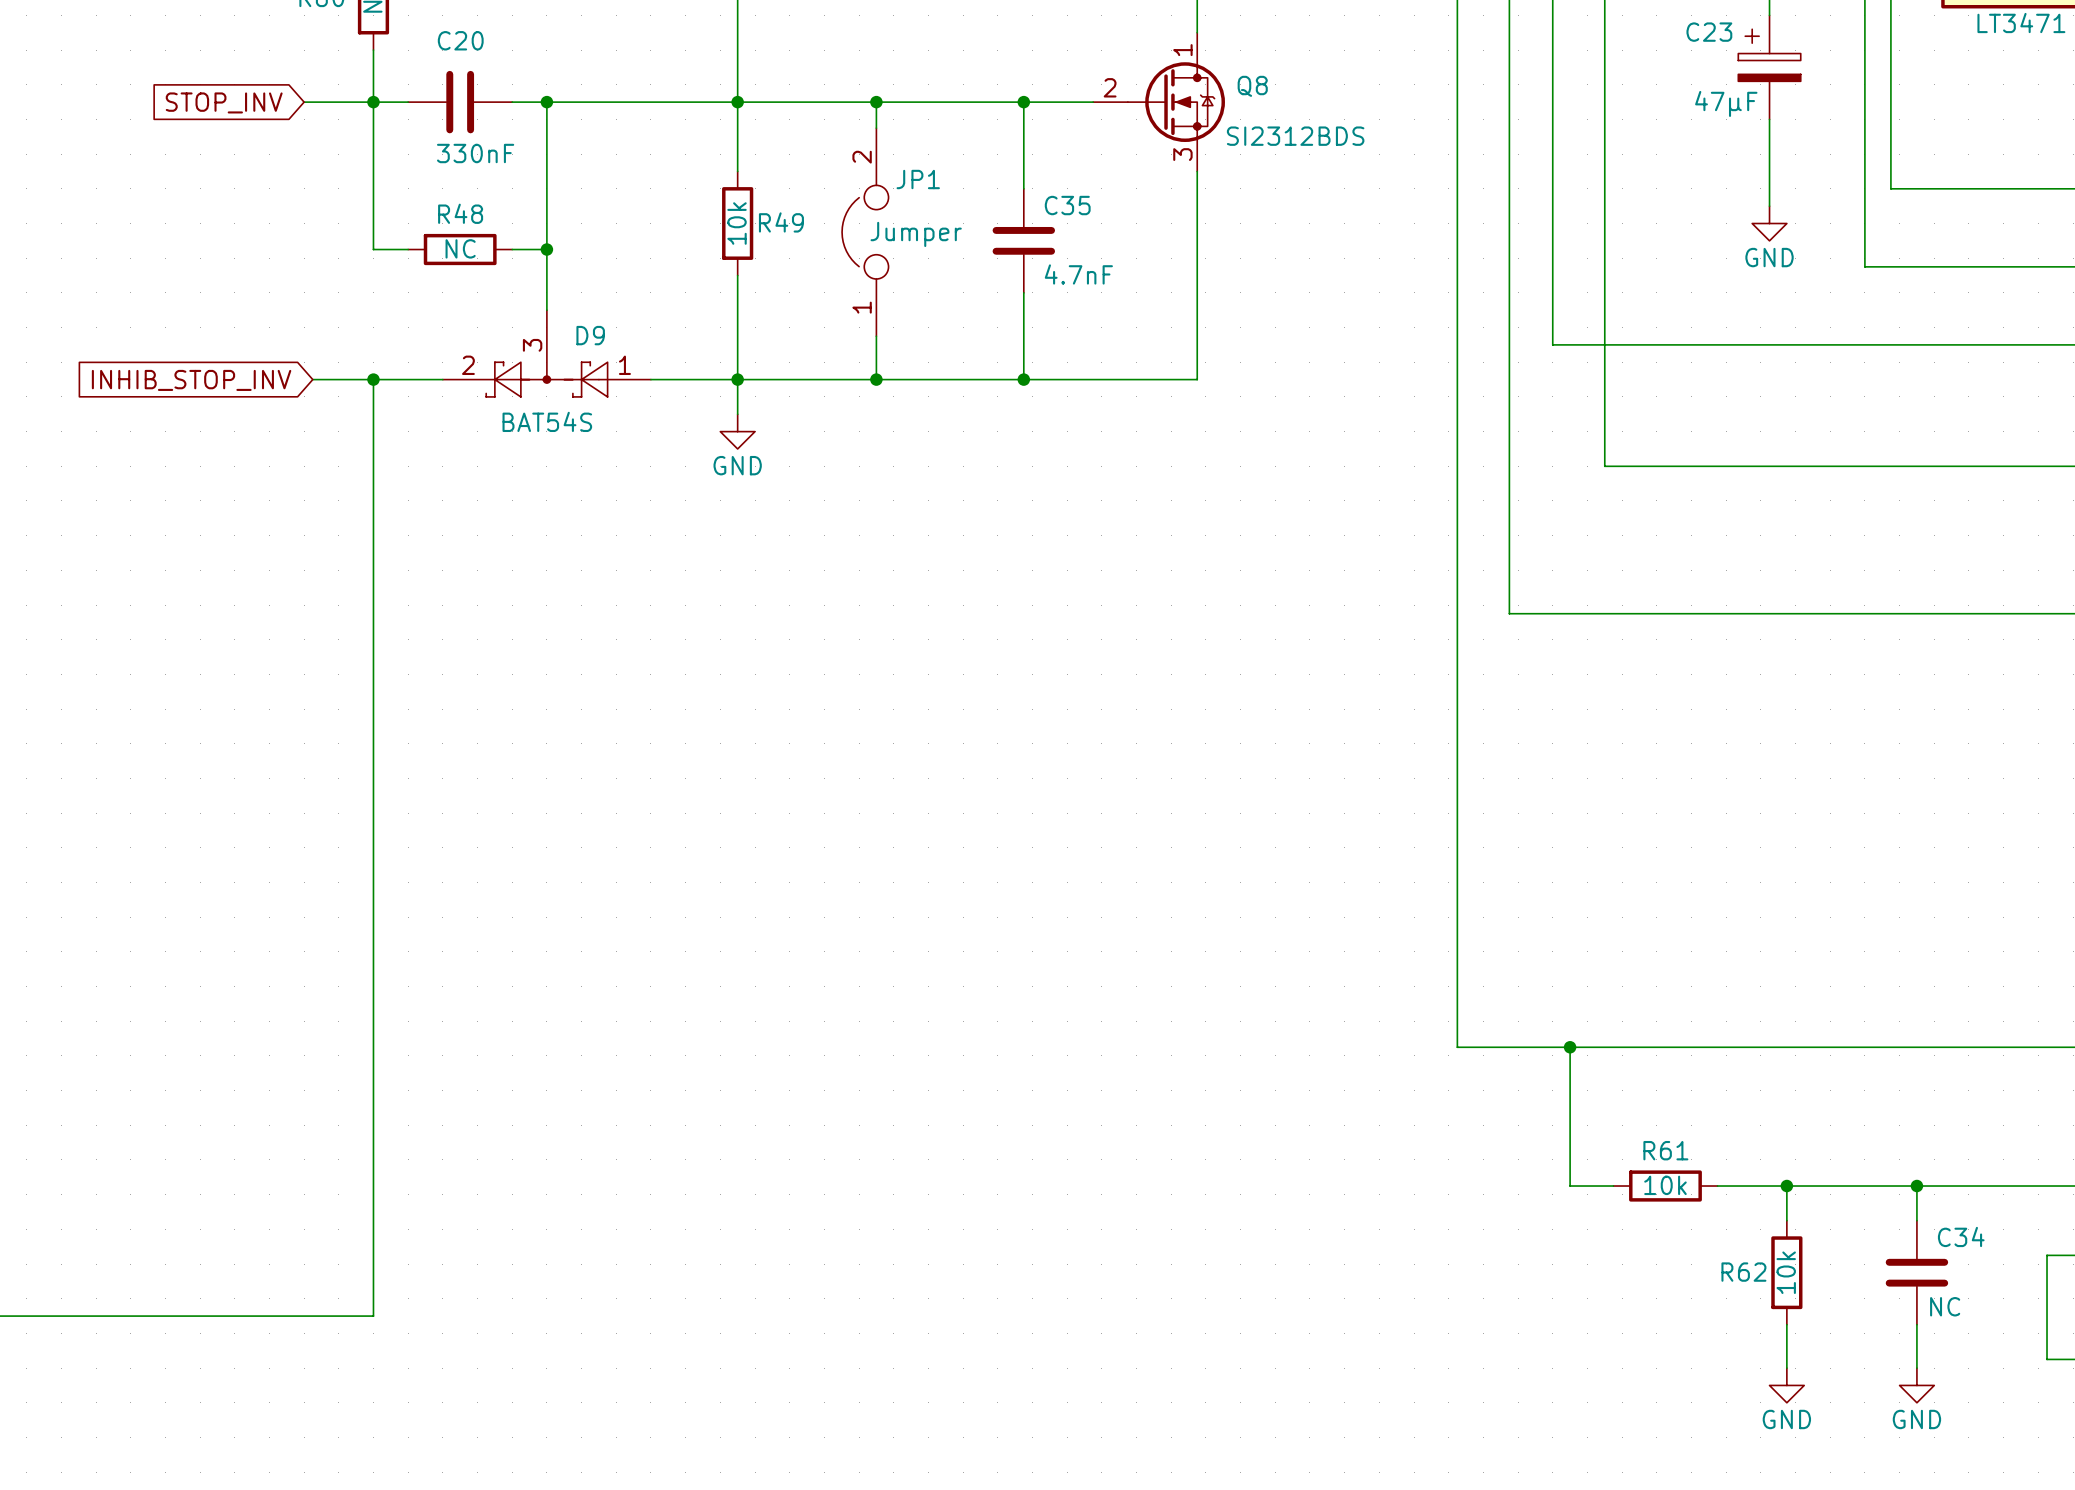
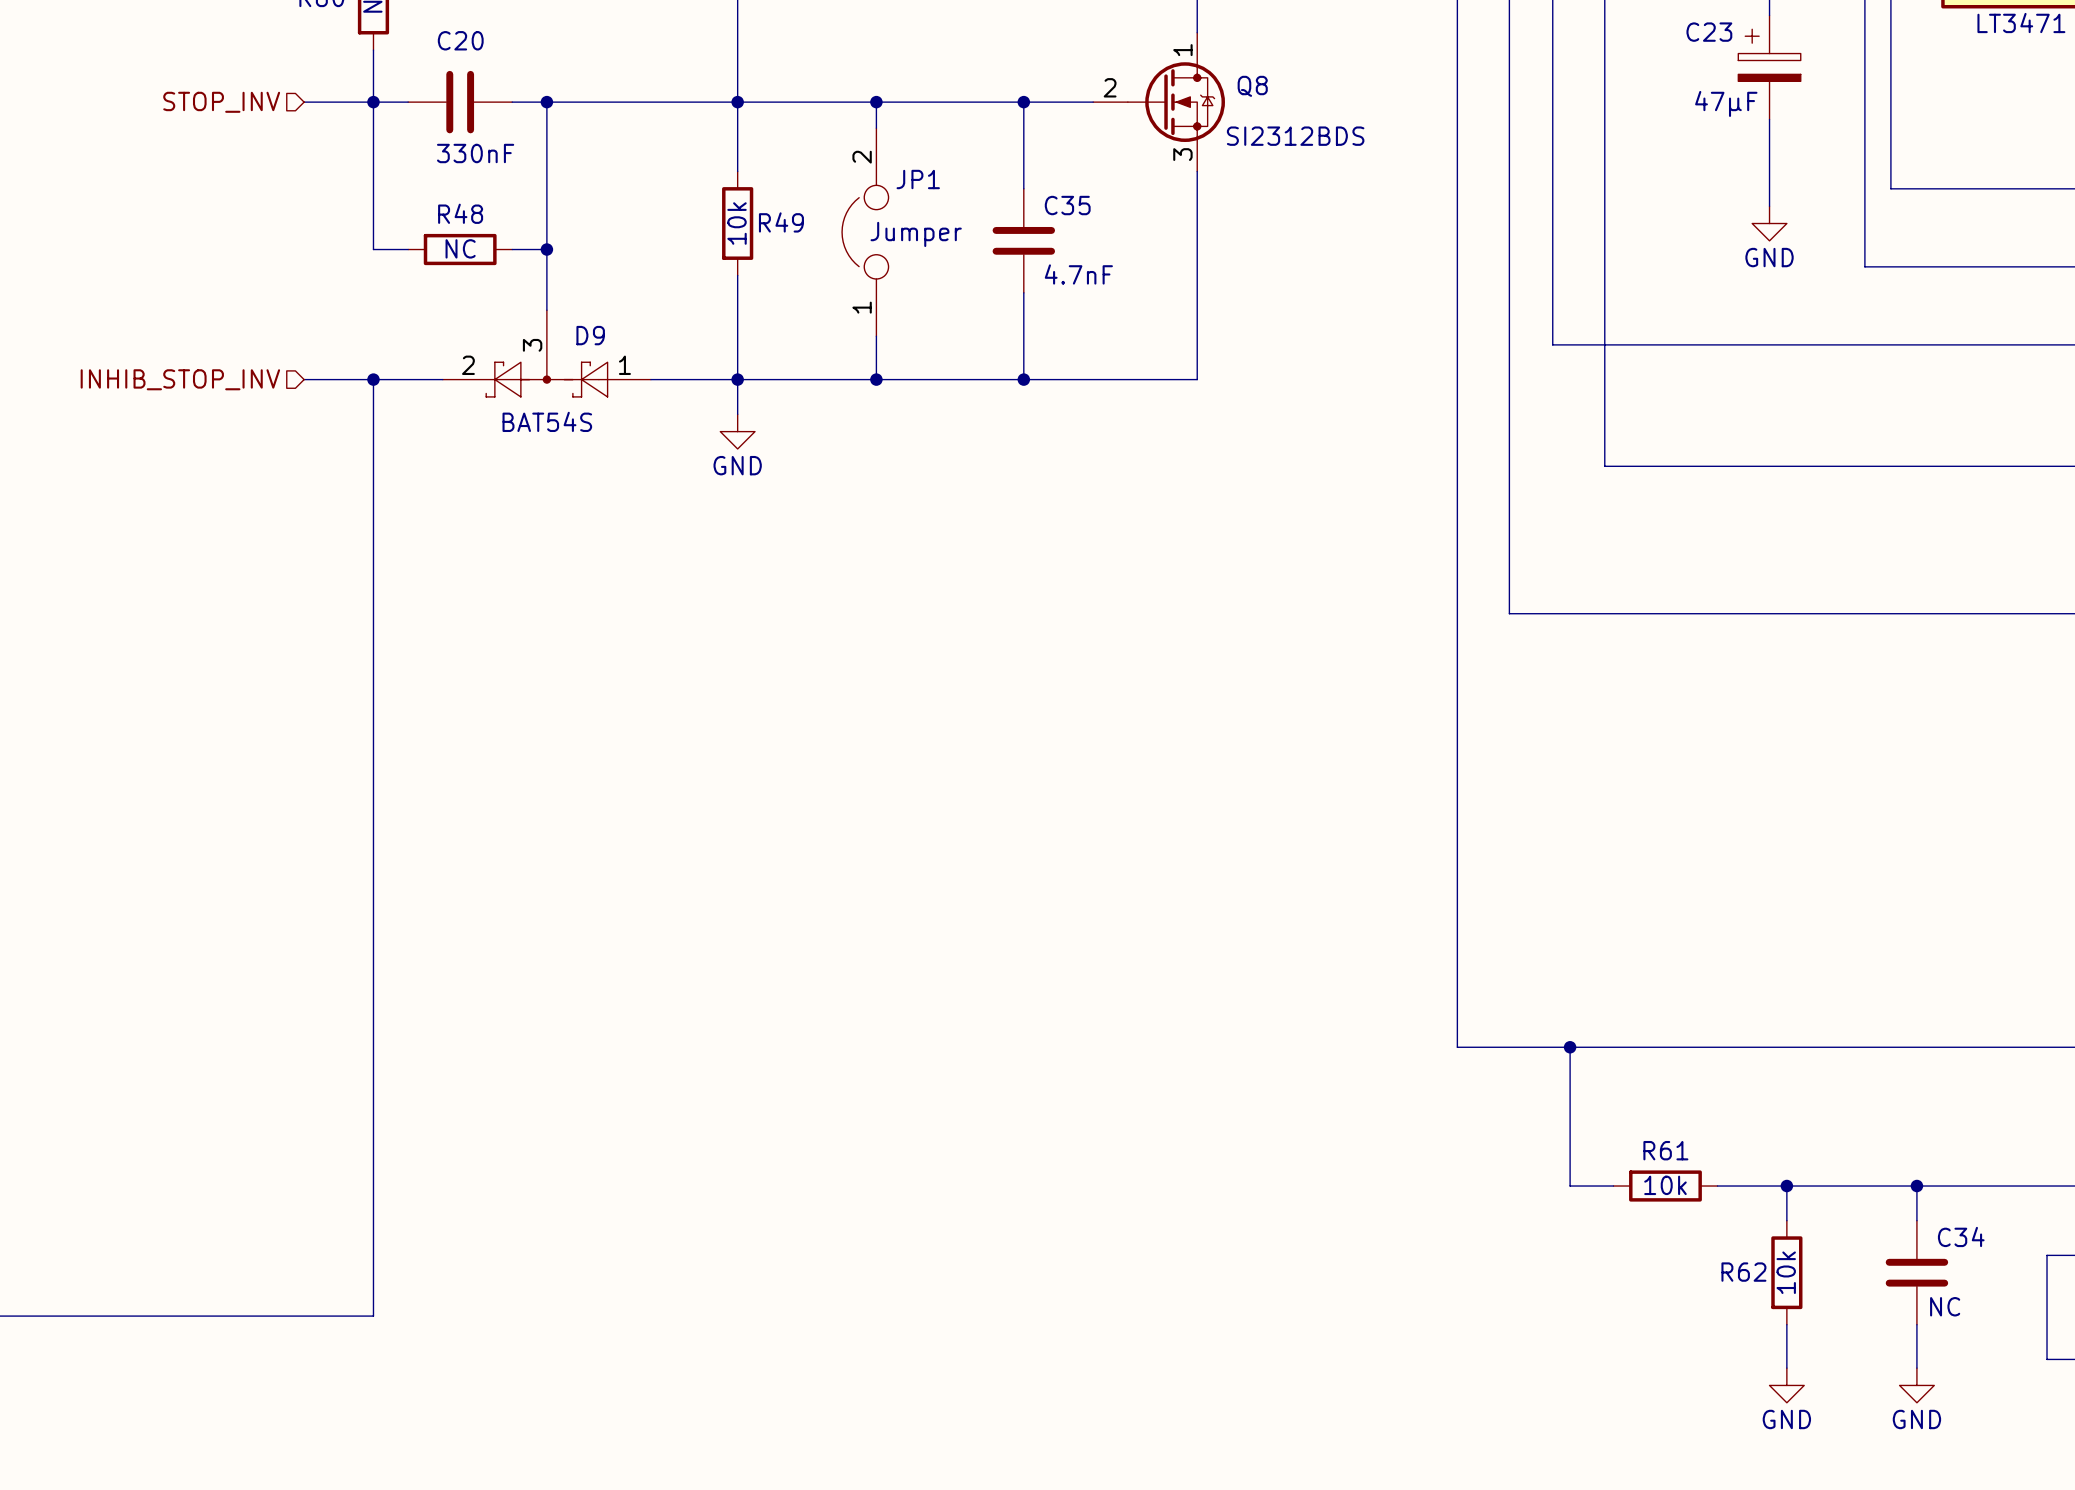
hierarchical label: none -> STOP_INV (221, 102)
global label: STOP_INV (224, 102) -> none
hierarchical label: none -> INHIB_STOP_INV (180, 379)
wire: none -> (304, 379) (312, 379)
global label: INHIB_STOP_INV (191, 380) -> none

